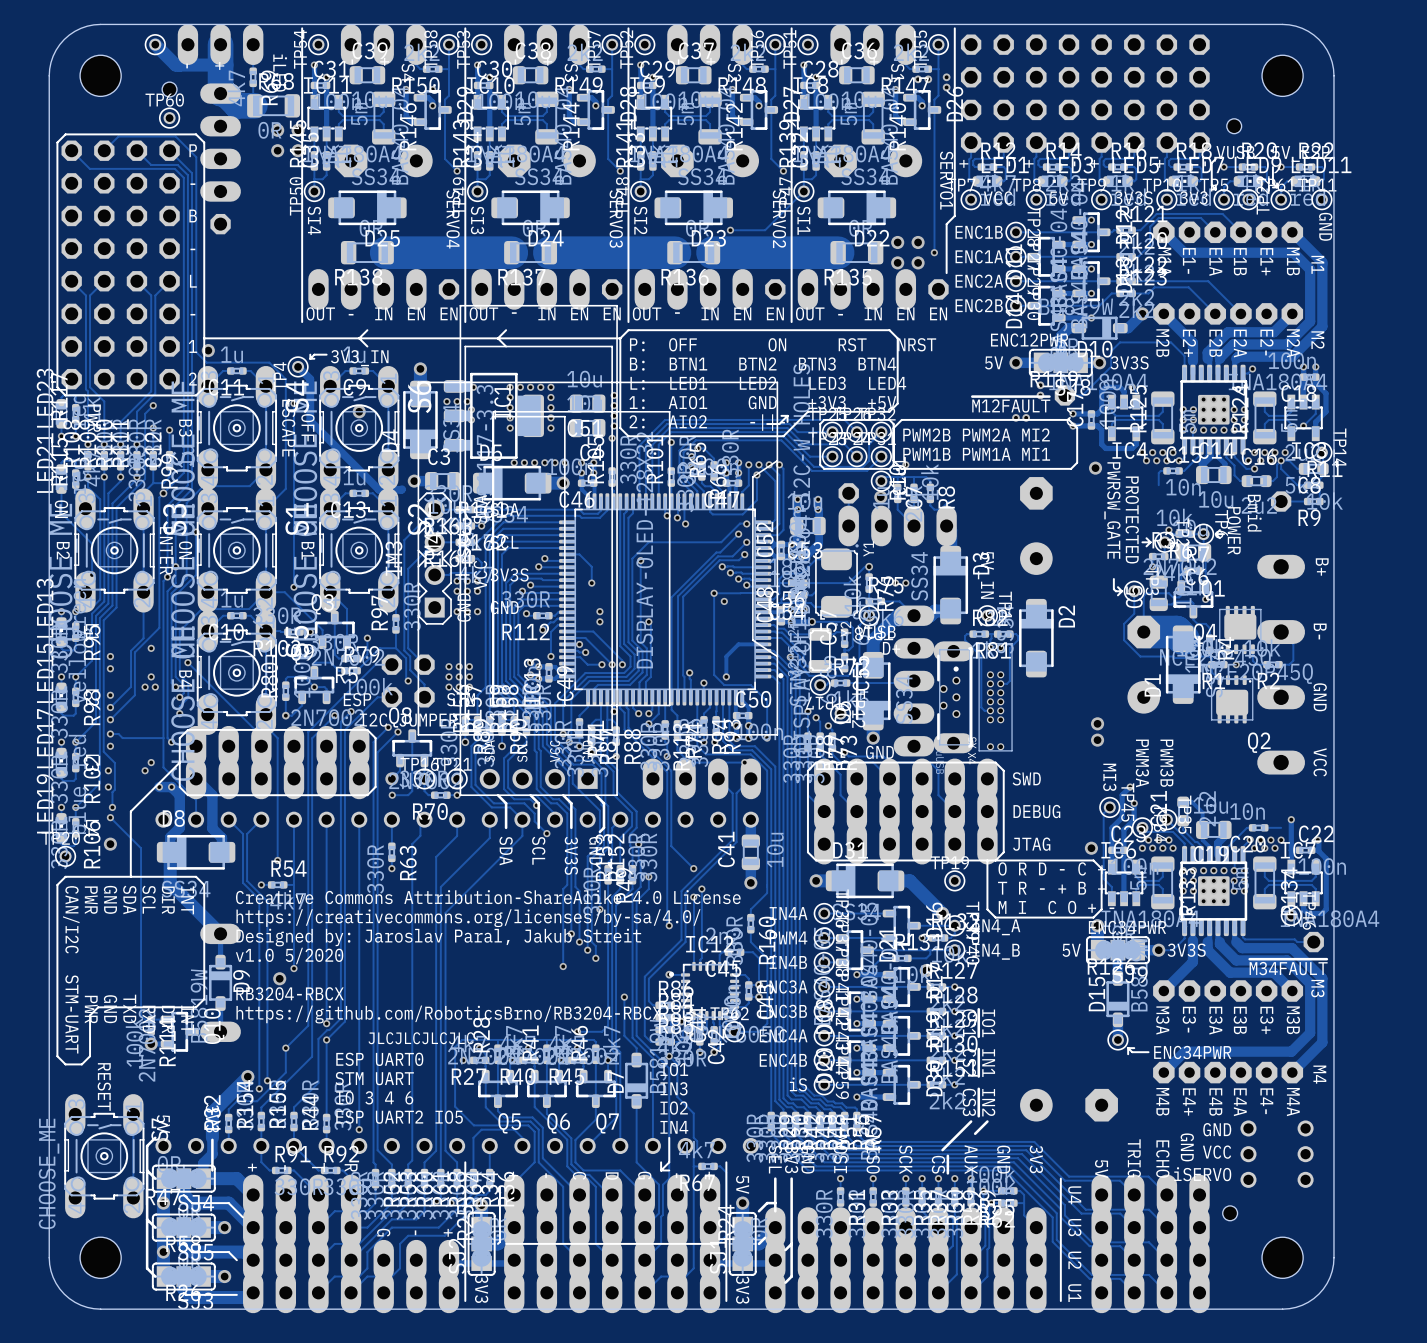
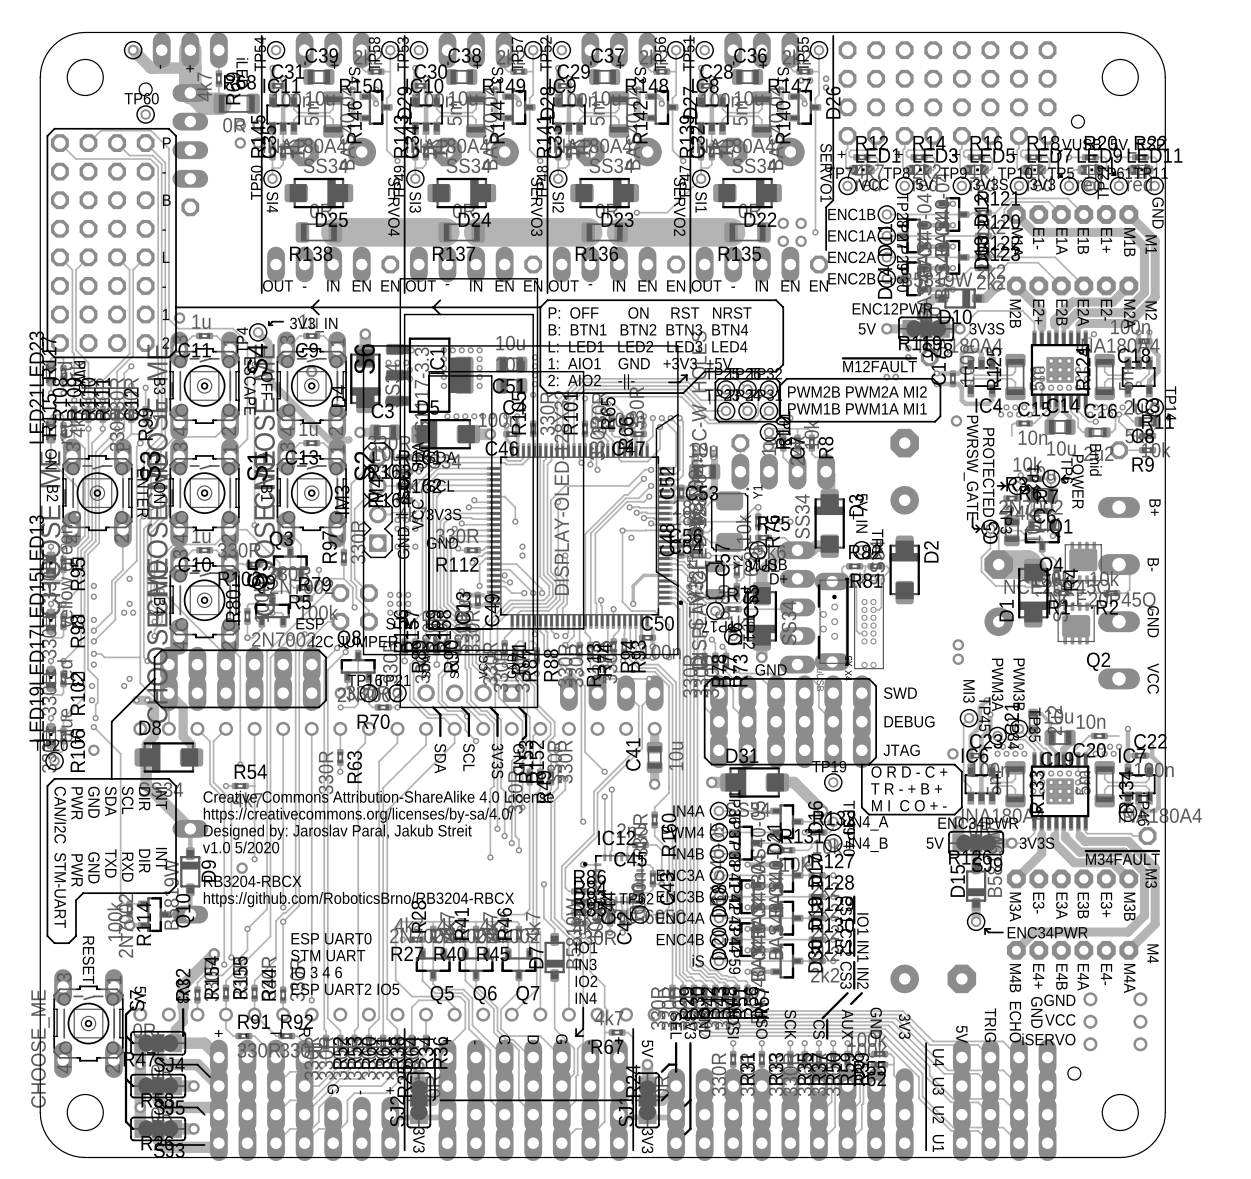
text: JLCJLCJLCJLC (421, 1038) -> none

